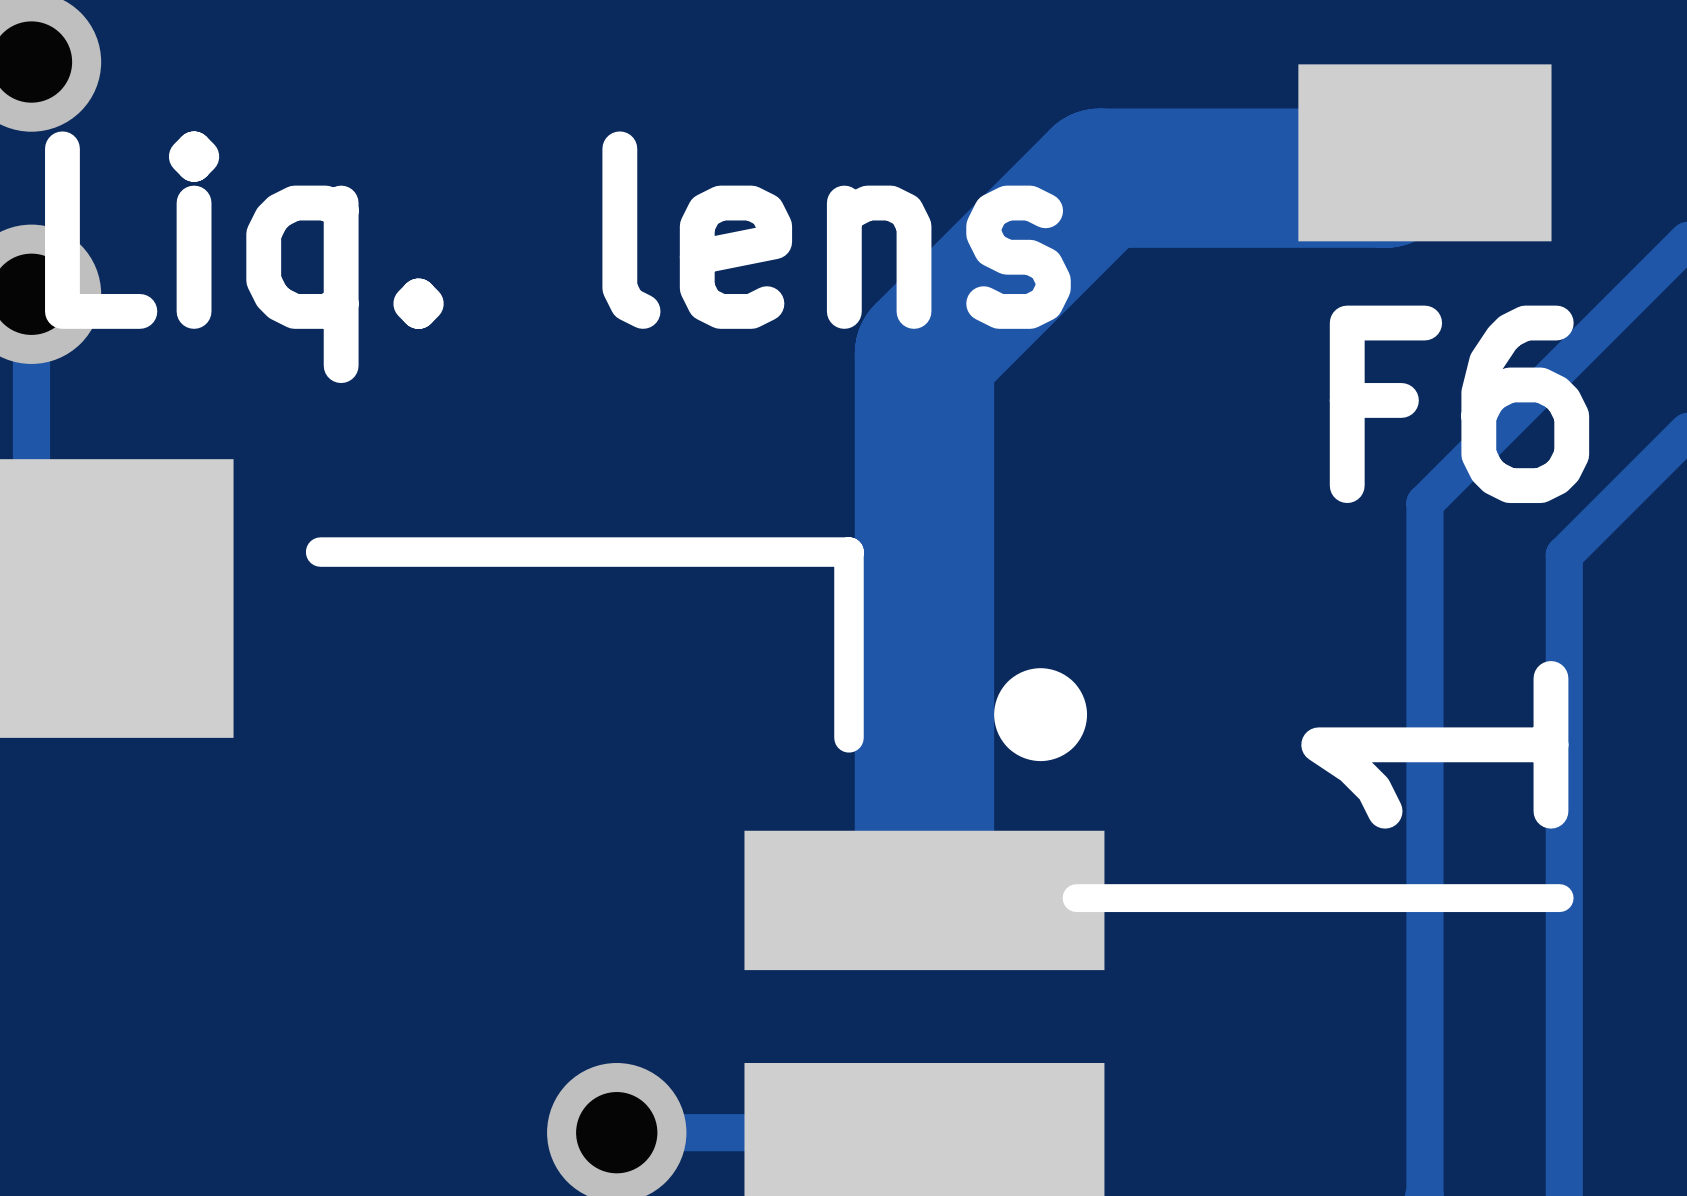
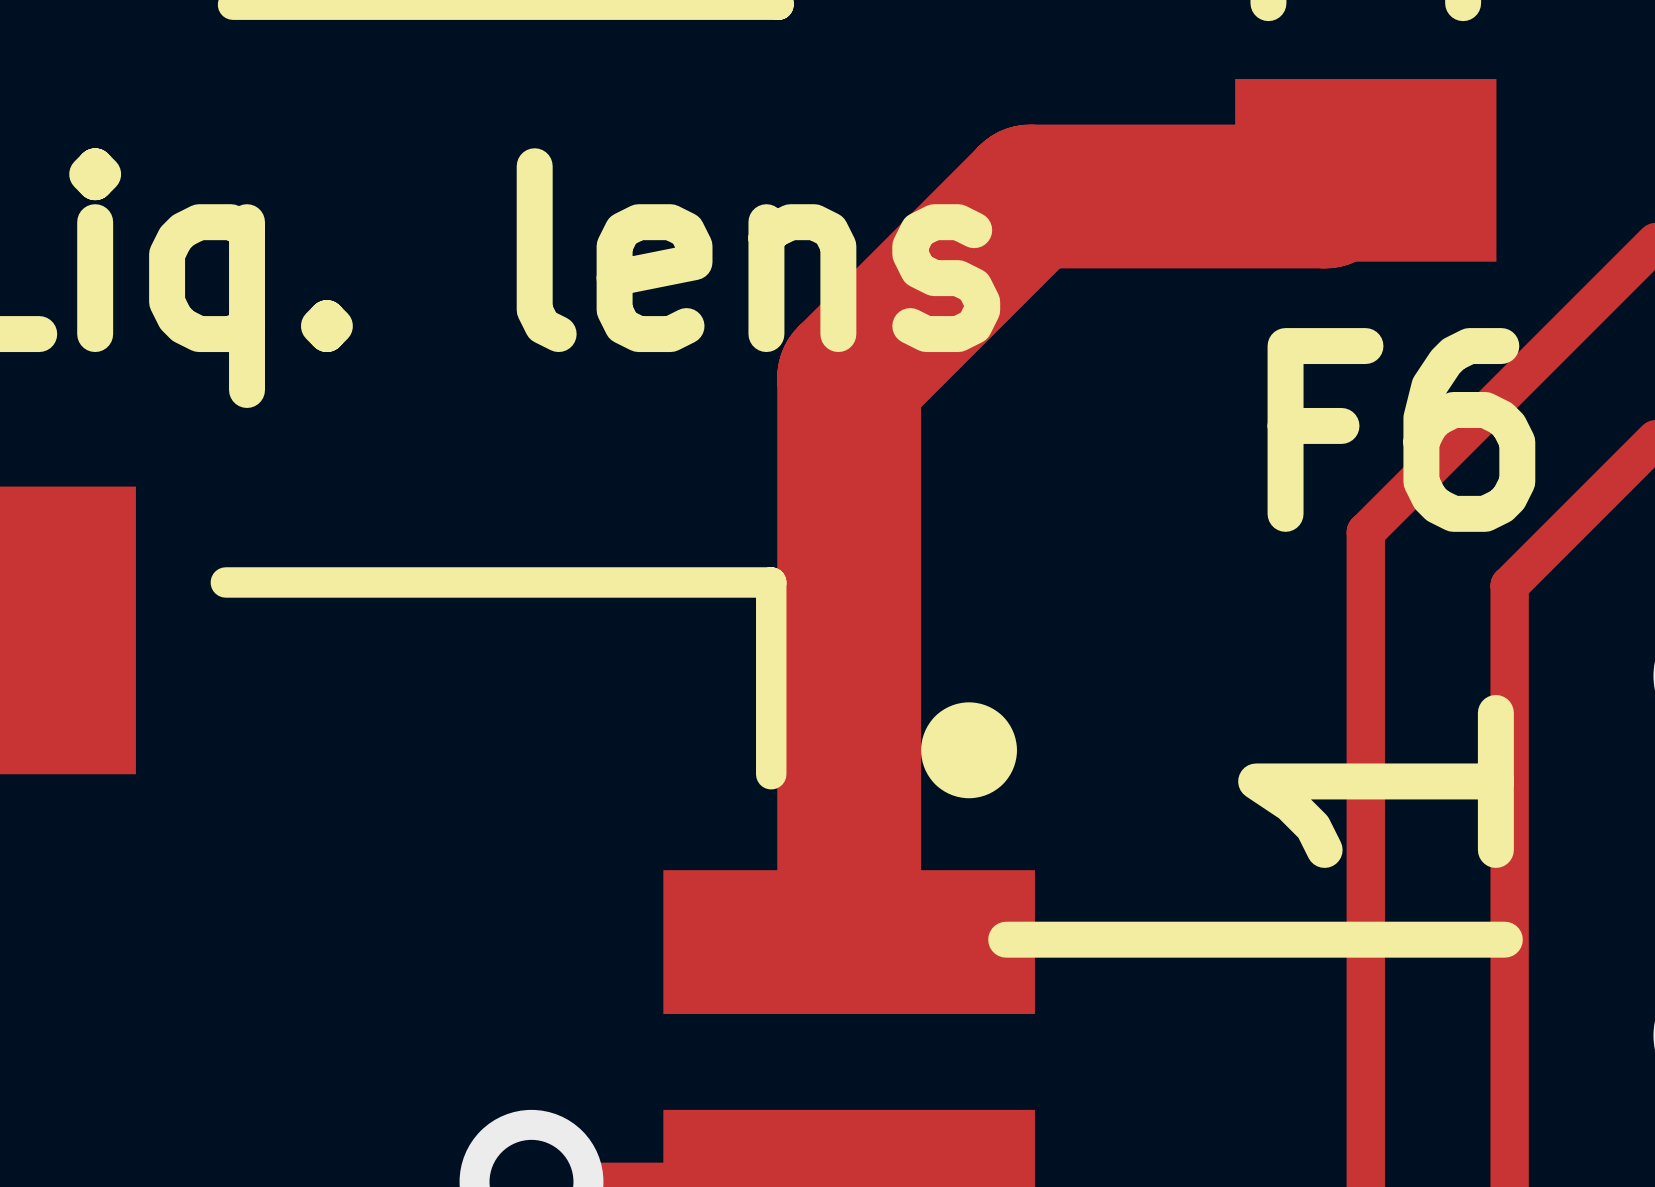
line width: thin (1076, 898) (1559, 898) -> thick (1006, 939) (1504, 939)

